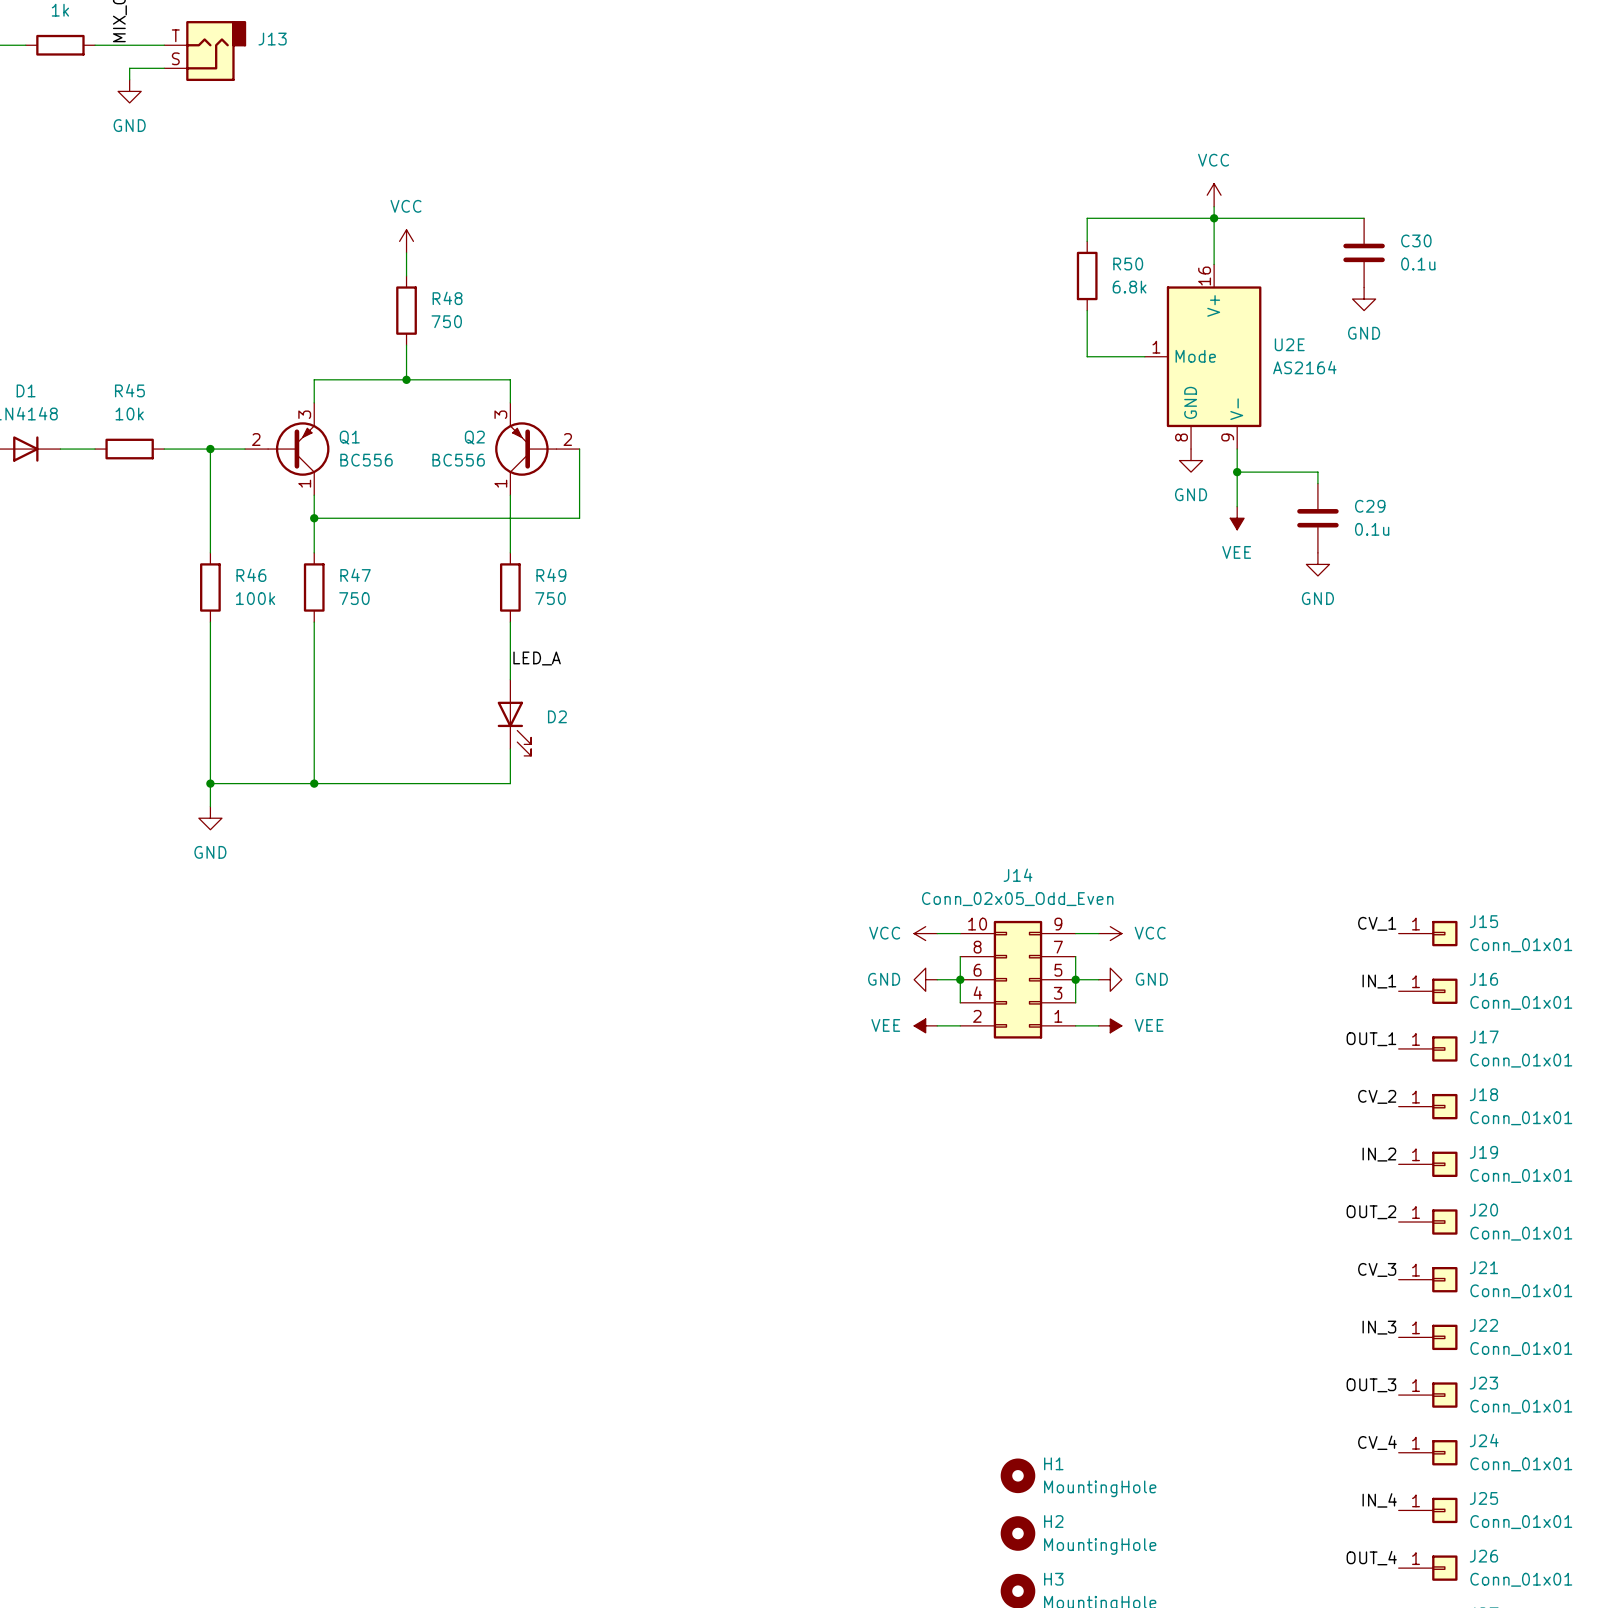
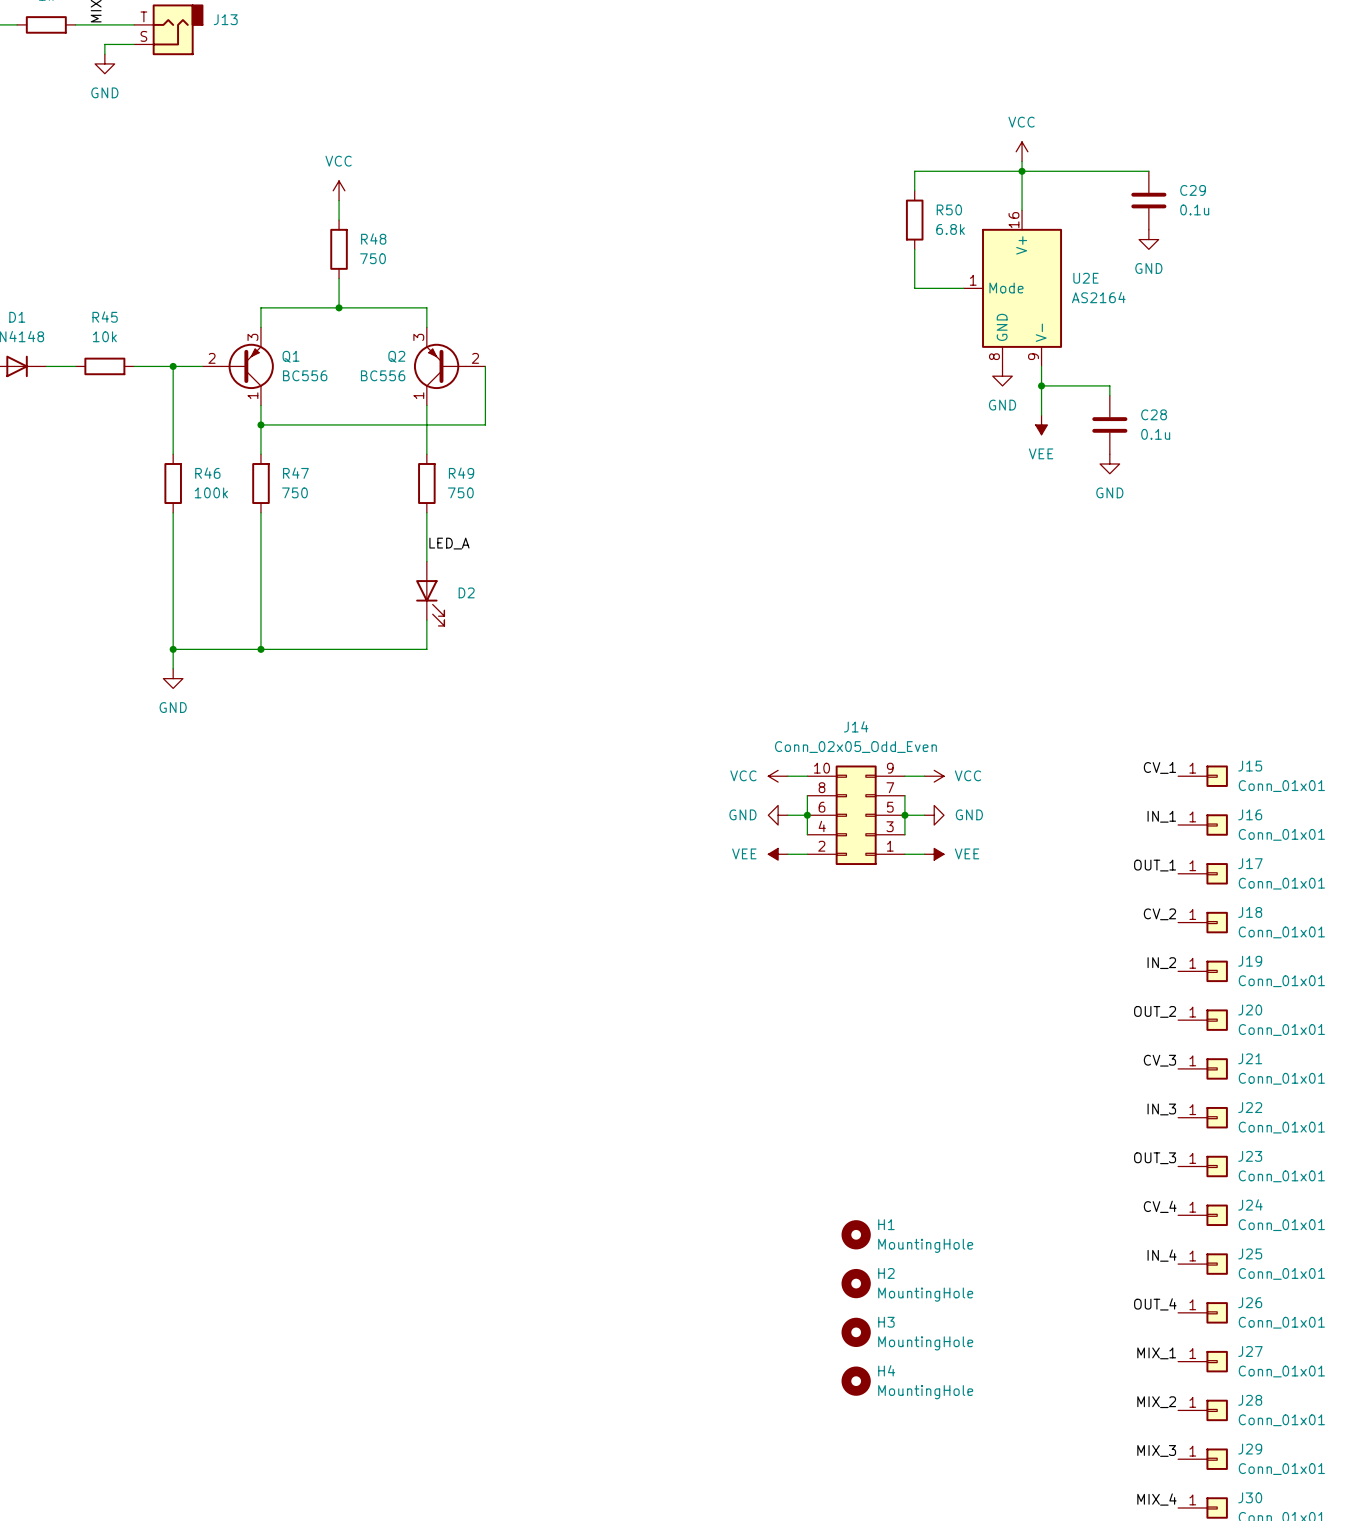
C30 name: C30 (1416, 240) -> C29 (1193, 190)
C29 name: C29 (1370, 506) -> C28 (1154, 414)

